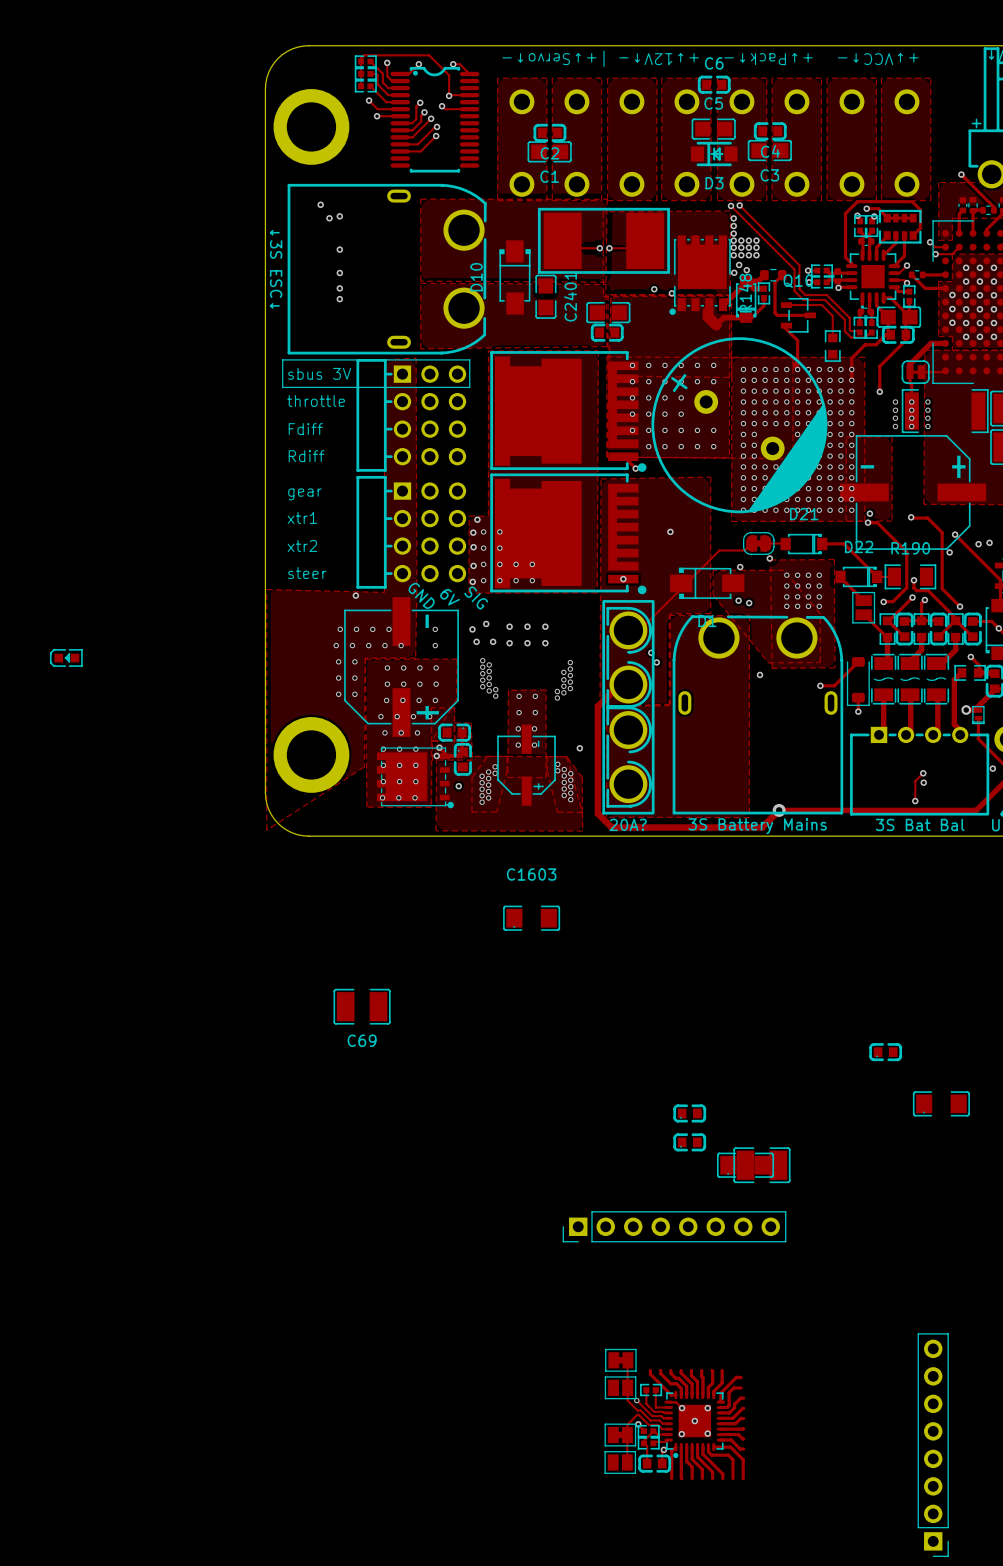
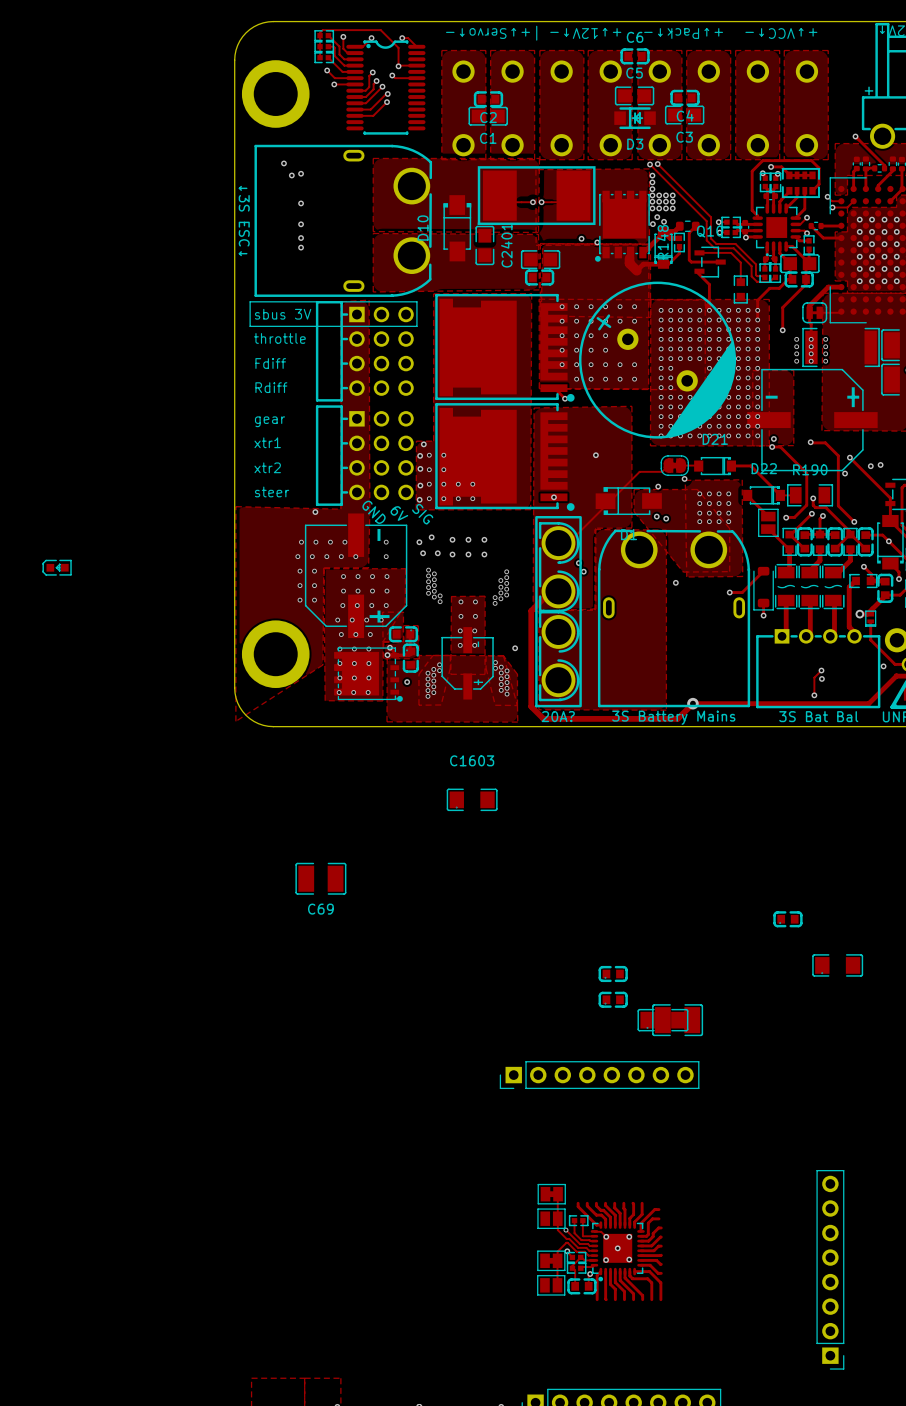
via: (952, 295) -> none
via: (952, 309) -> none
via: (952, 322) -> none

